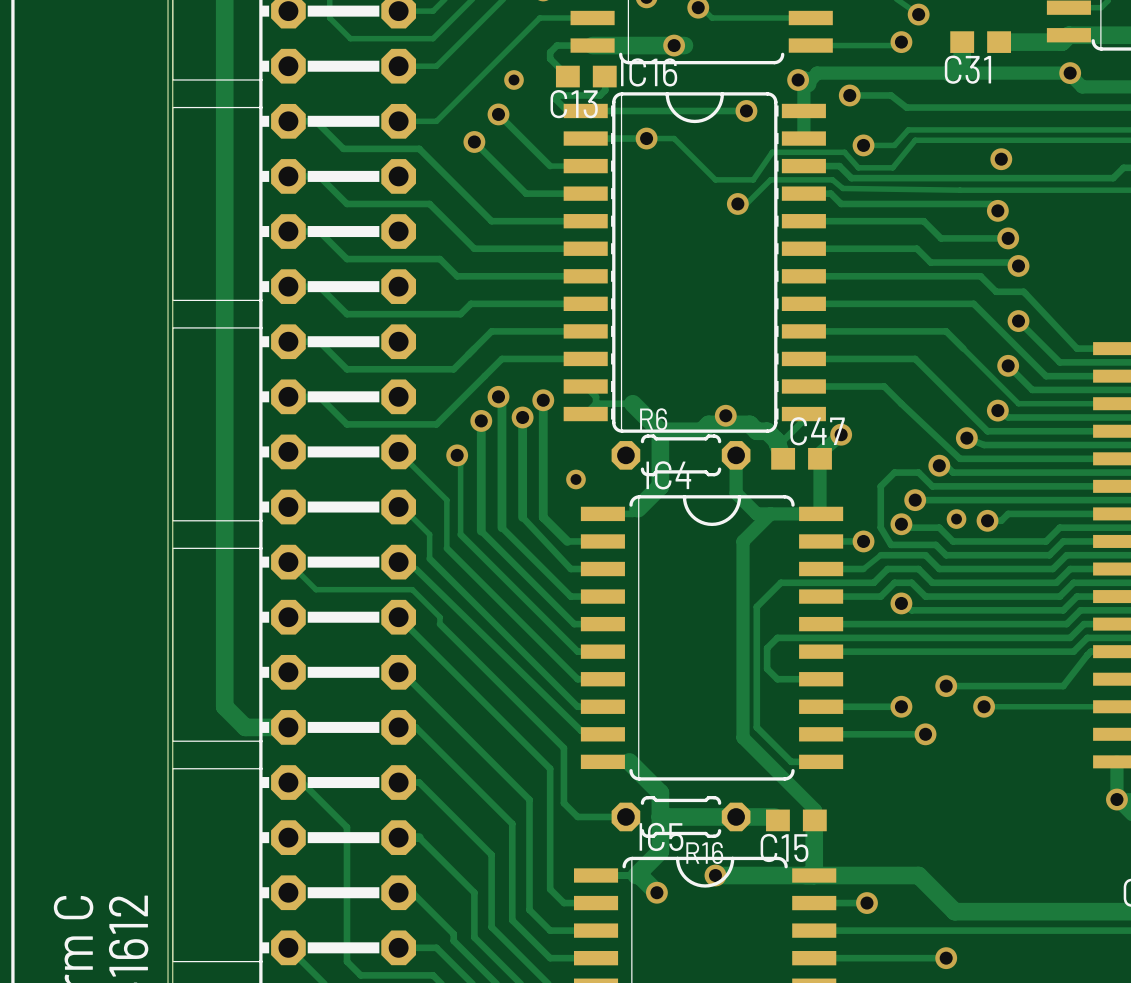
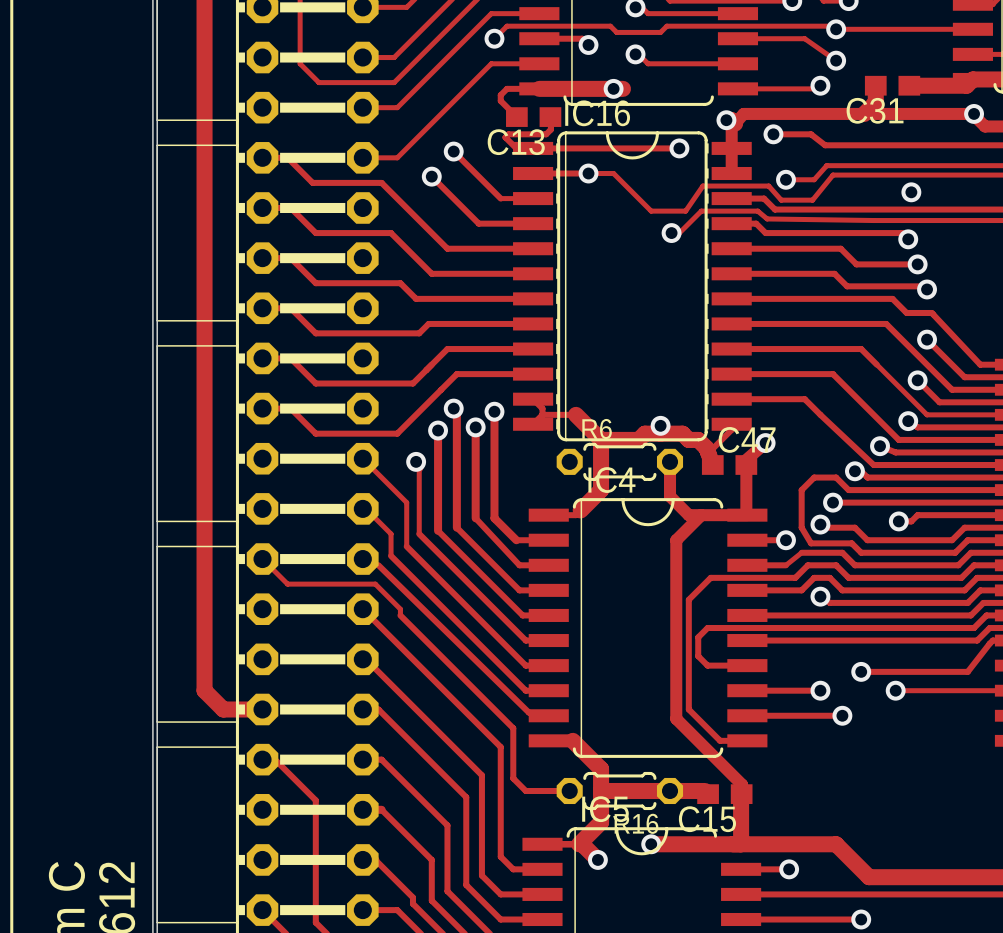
via: (514, 79) -> none
via: (575, 479) -> none
via: (956, 519) -> none

